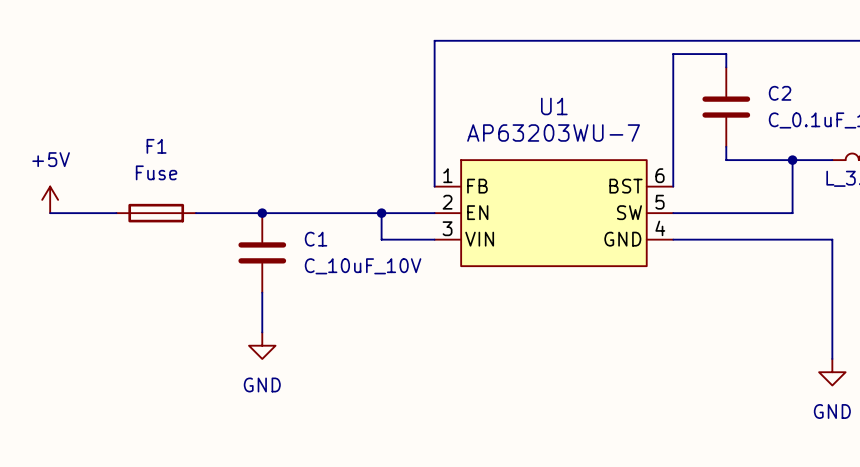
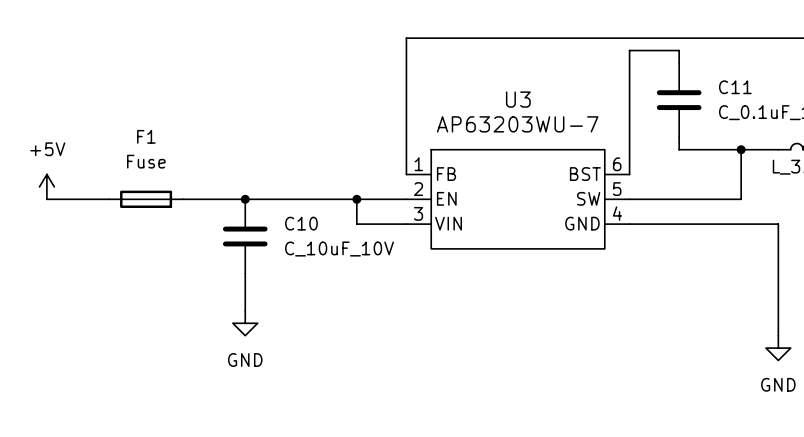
C2 name: C2 (780, 93) -> C11 (735, 87)
U1 name: U1 (554, 106) -> U3 (518, 99)
C1 name: C1 (316, 239) -> C10 (301, 223)

